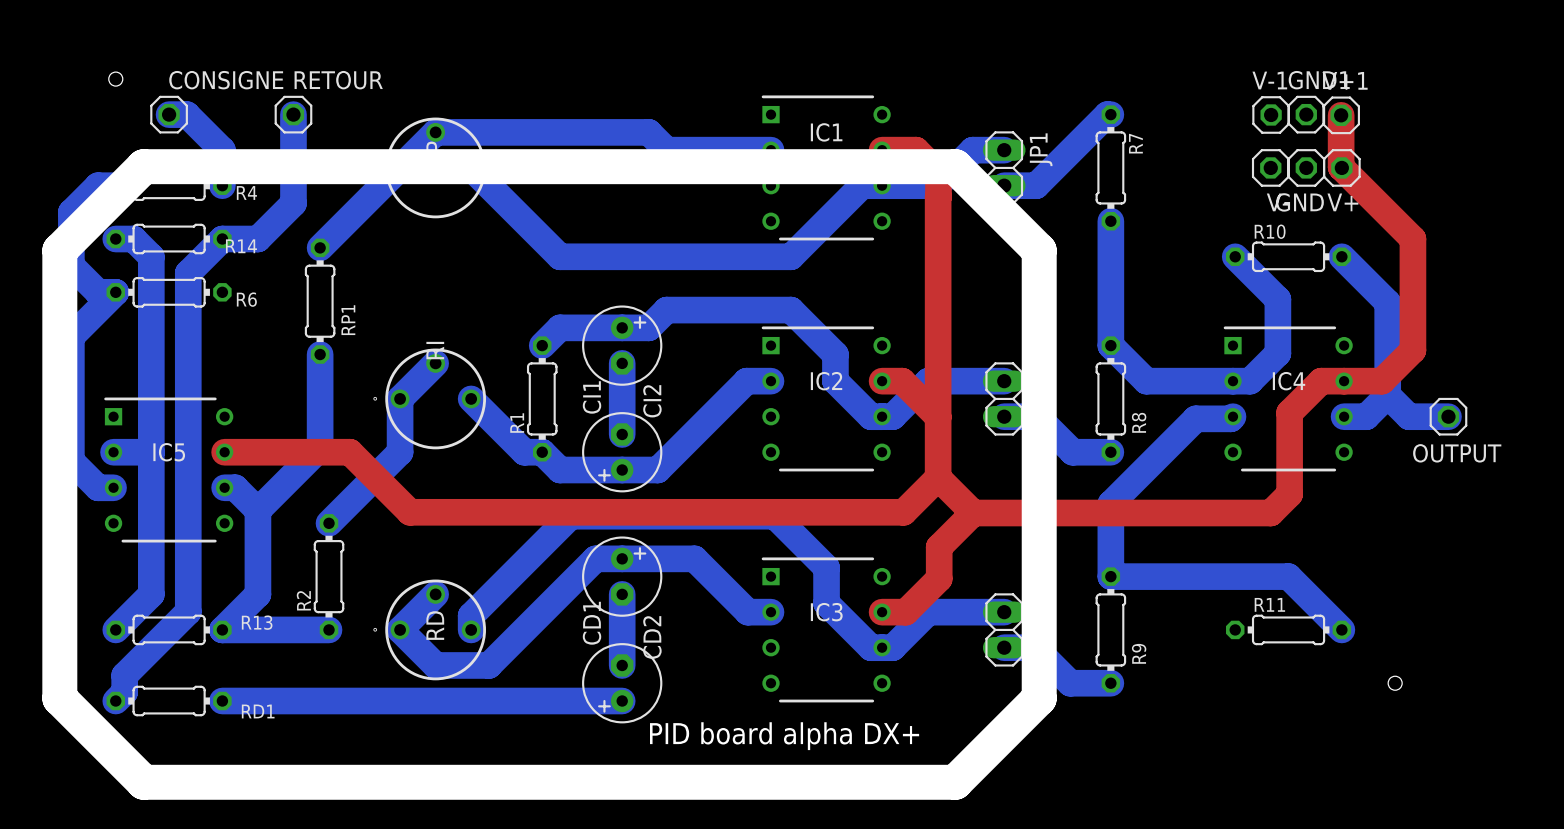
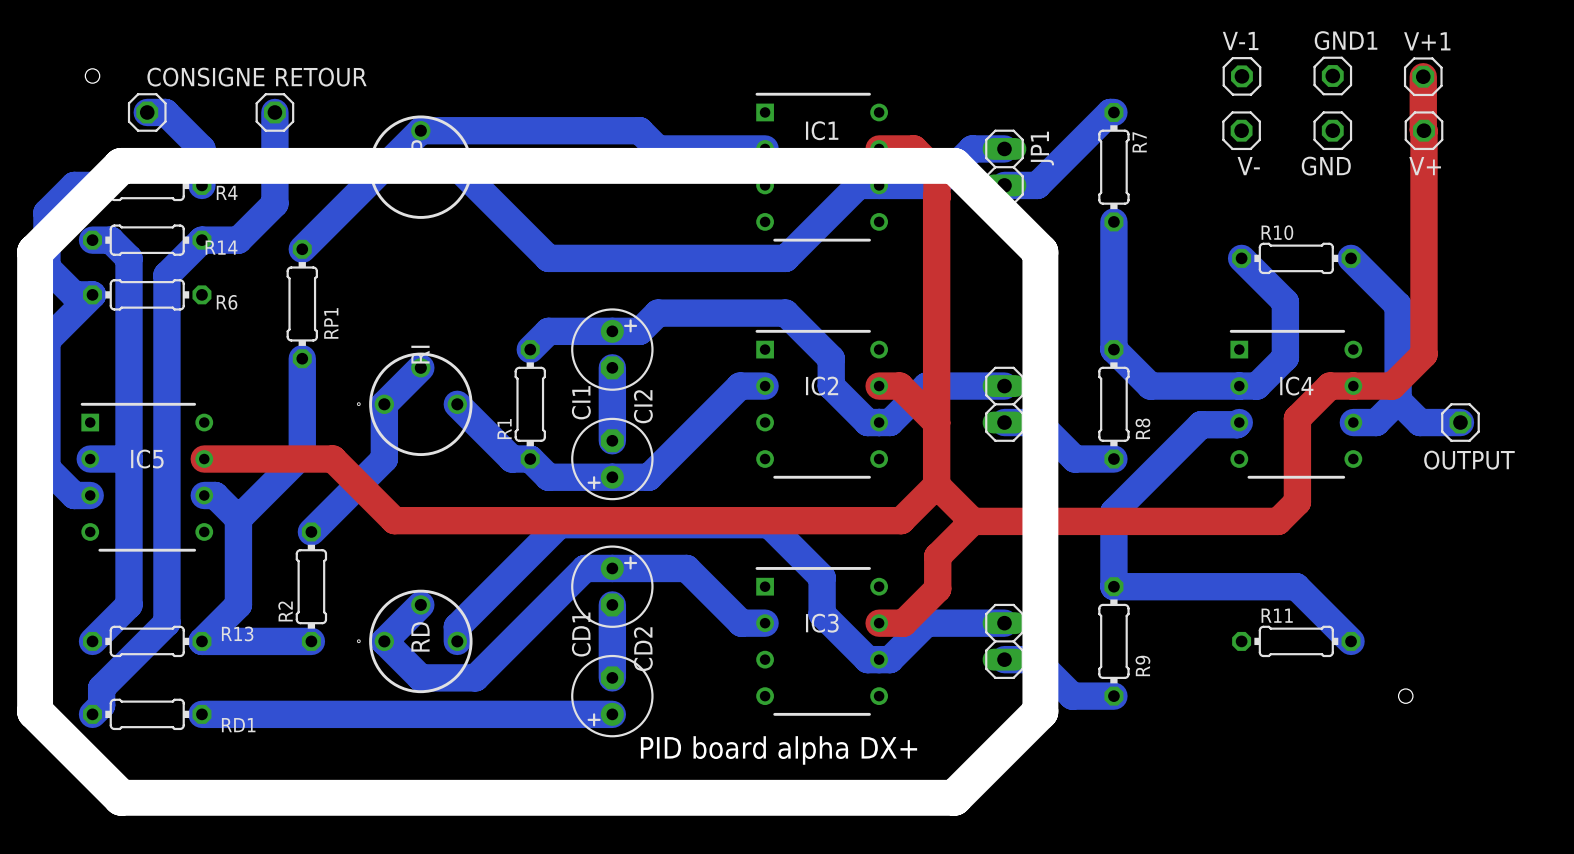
V-1 position: (1271, 114) -> (1241, 76)
GND1 position: (1306, 114) -> (1332, 75)
top track: (1341, 115) (1341, 167) (1412, 239) -> (1423, 76) (1424, 240)
V+1 position: (1341, 115) -> (1423, 76)
V- position: (1270, 167) -> (1241, 130)
GND position: (1306, 167) -> (1332, 130)
V+ position: (1341, 167) -> (1424, 130)

